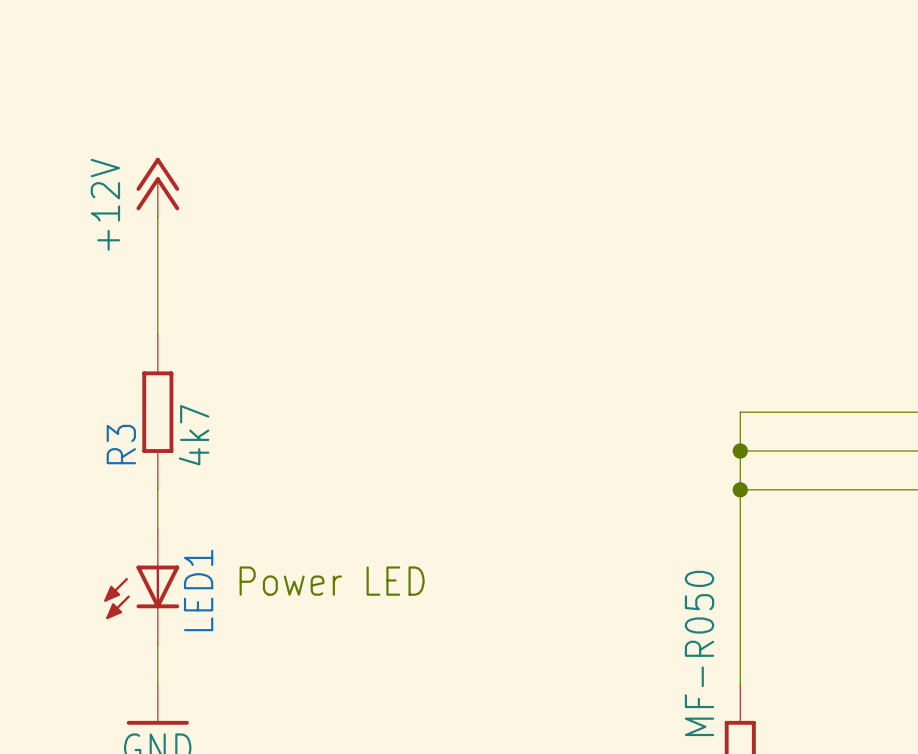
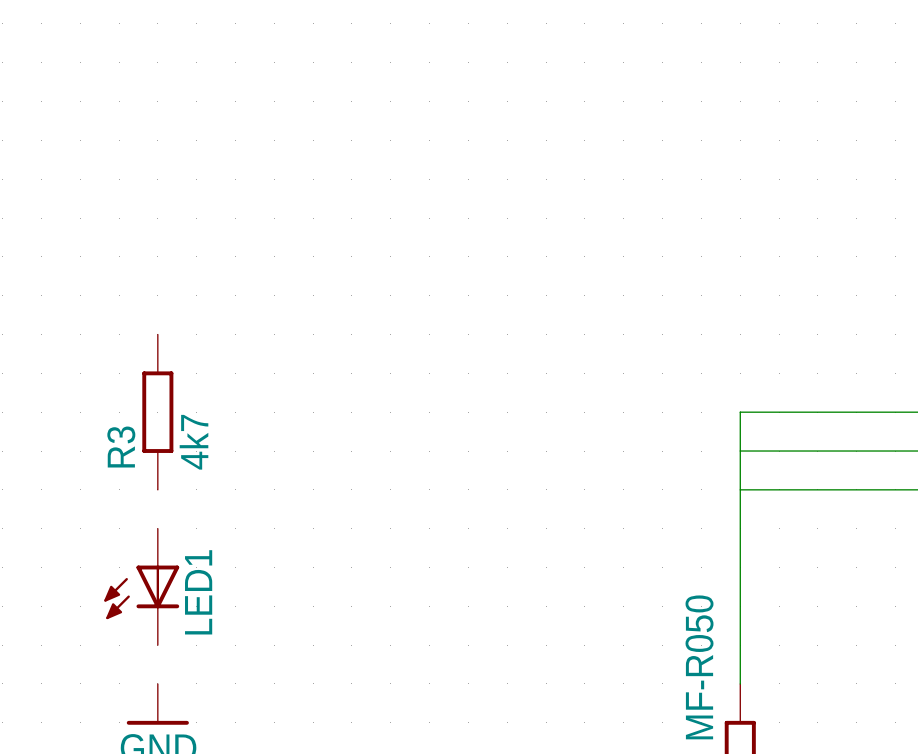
power symbol: +12V (157, 187) -> none
wire: (157, 218) (157, 334) -> none
junction: (740, 451) -> none
wire: (157, 489) (157, 528) -> none
junction: (740, 489) -> none
text: Power LED (332, 581) -> none
wire: (157, 645) (157, 683) -> none

